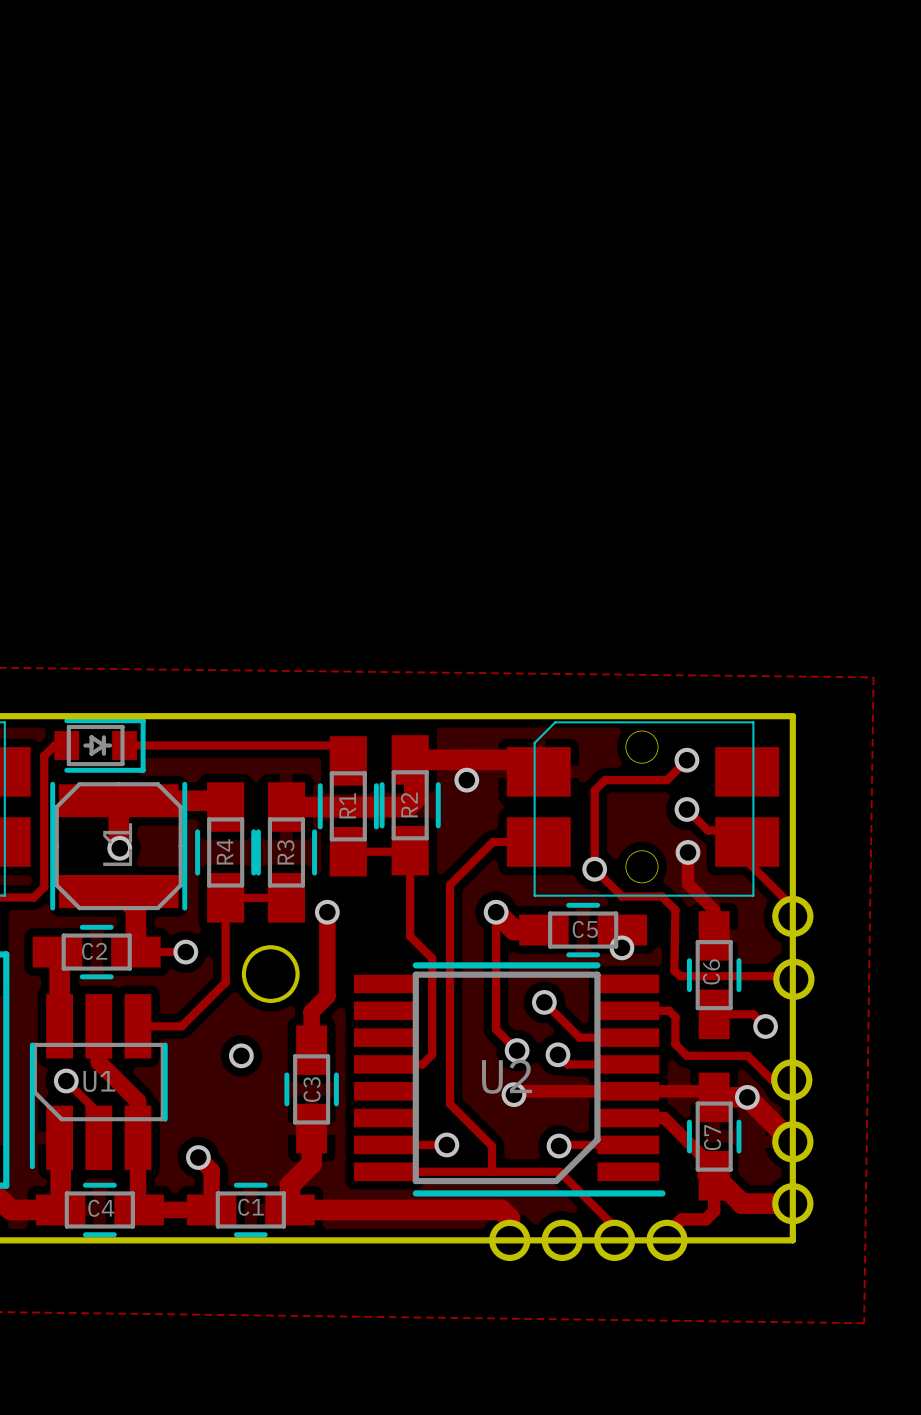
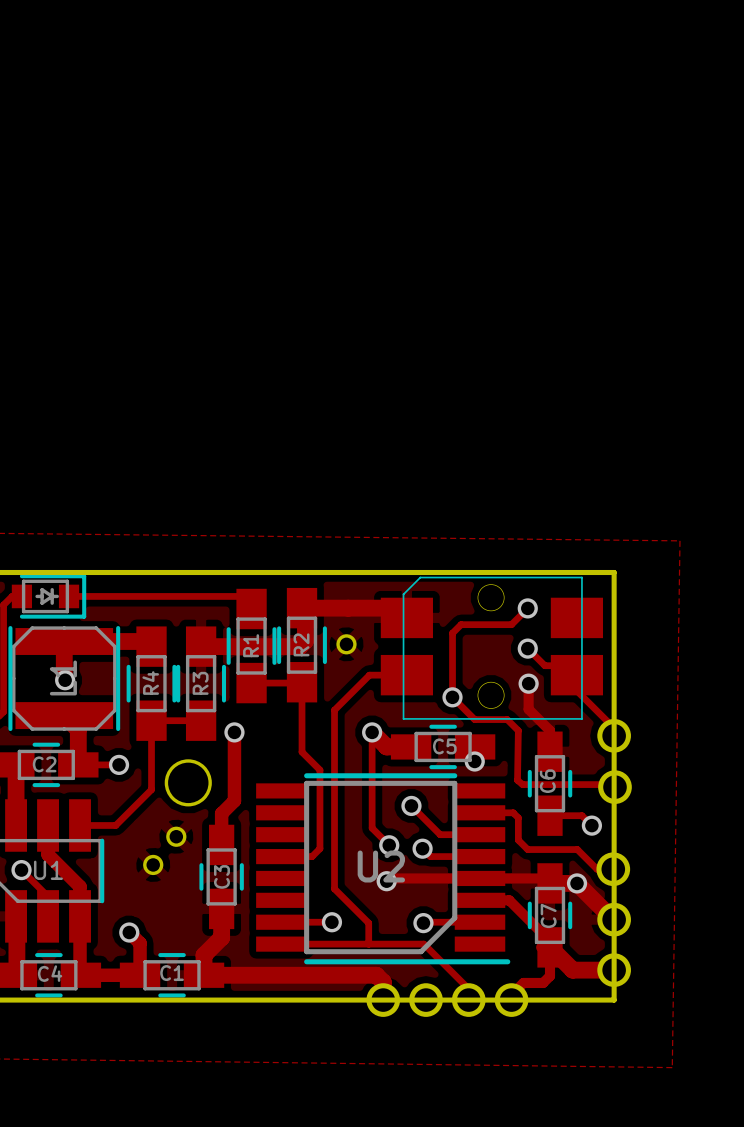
via: (466, 780) -> none
part: none -> (346, 644)
part: none -> (176, 836)
via: (241, 1055) -> none
part: none -> (153, 864)

